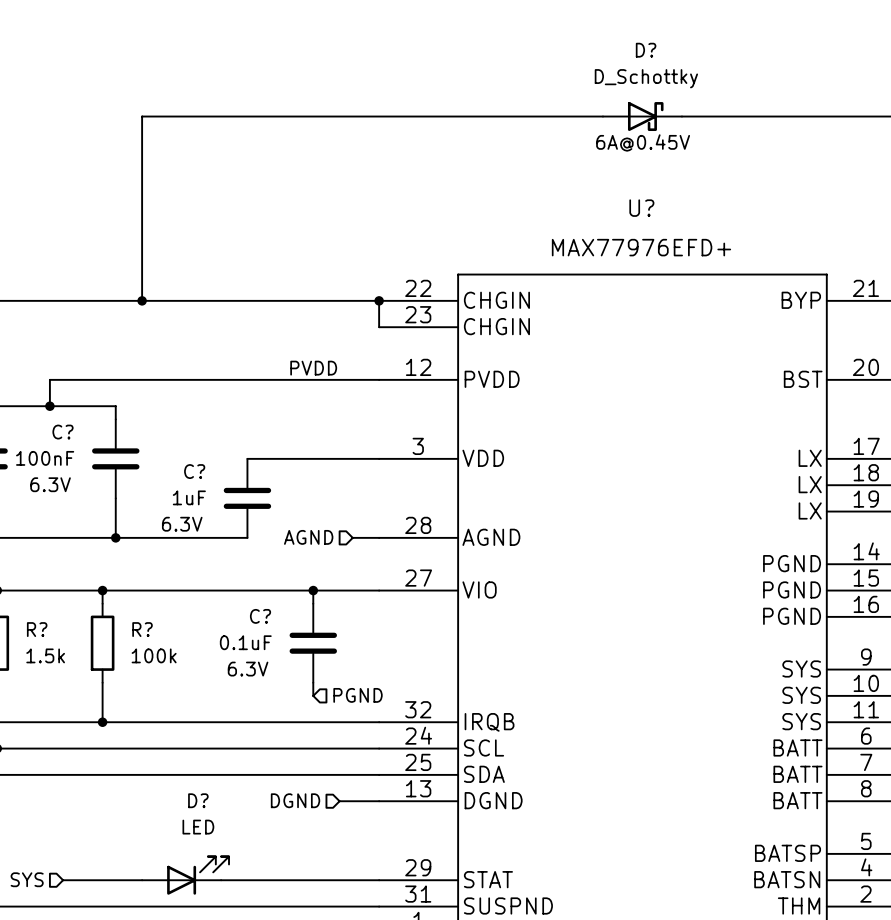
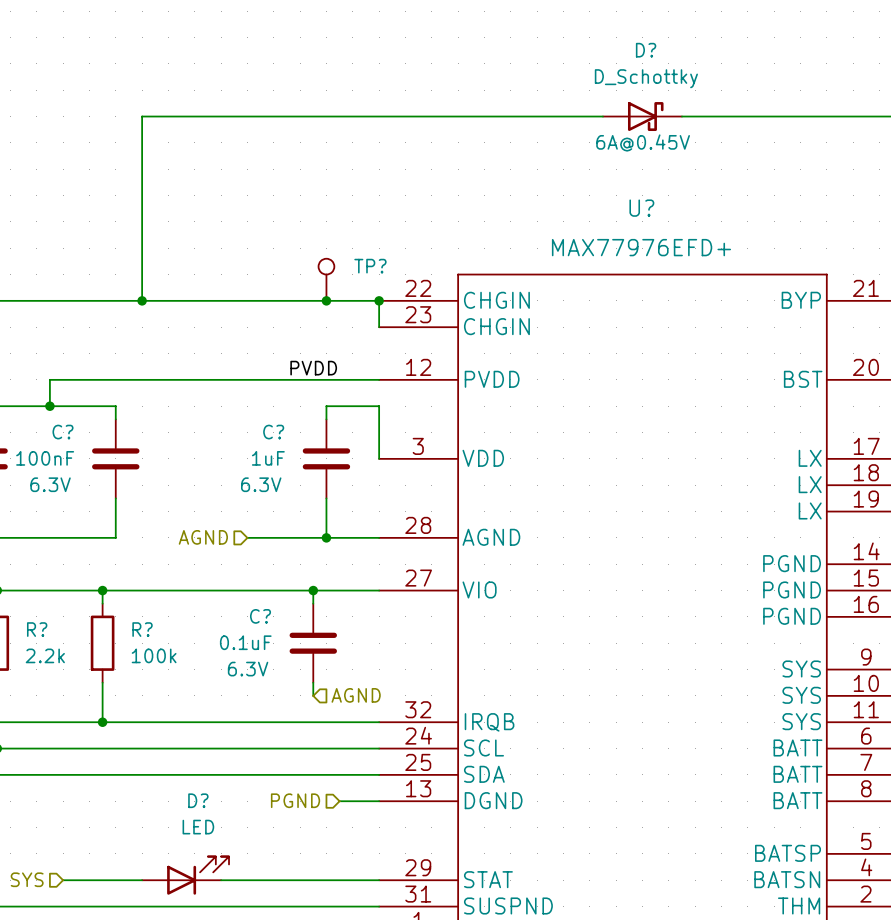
TP?: none -> (326, 279)
junction: none -> (326, 300)
wire: (247, 458) (379, 458) -> (326, 419) (326, 406) (379, 406) (379, 458)
C? position: (247, 498) -> (326, 458)
wire: none -> (326, 498) (326, 537)
wire: (115, 537) (247, 537) -> (352, 537) (247, 537)
junction: (115, 537) -> none
hierarchical label position: AGND (308, 537) -> AGND (203, 537)
junction: none -> (326, 537)
R? value: 1.5k (45, 655) -> 2.2k (45, 655)
hierarchical label: PGND (358, 695) -> AGND (356, 695)
hierarchical label: DGND (295, 800) -> PGND (295, 800)

